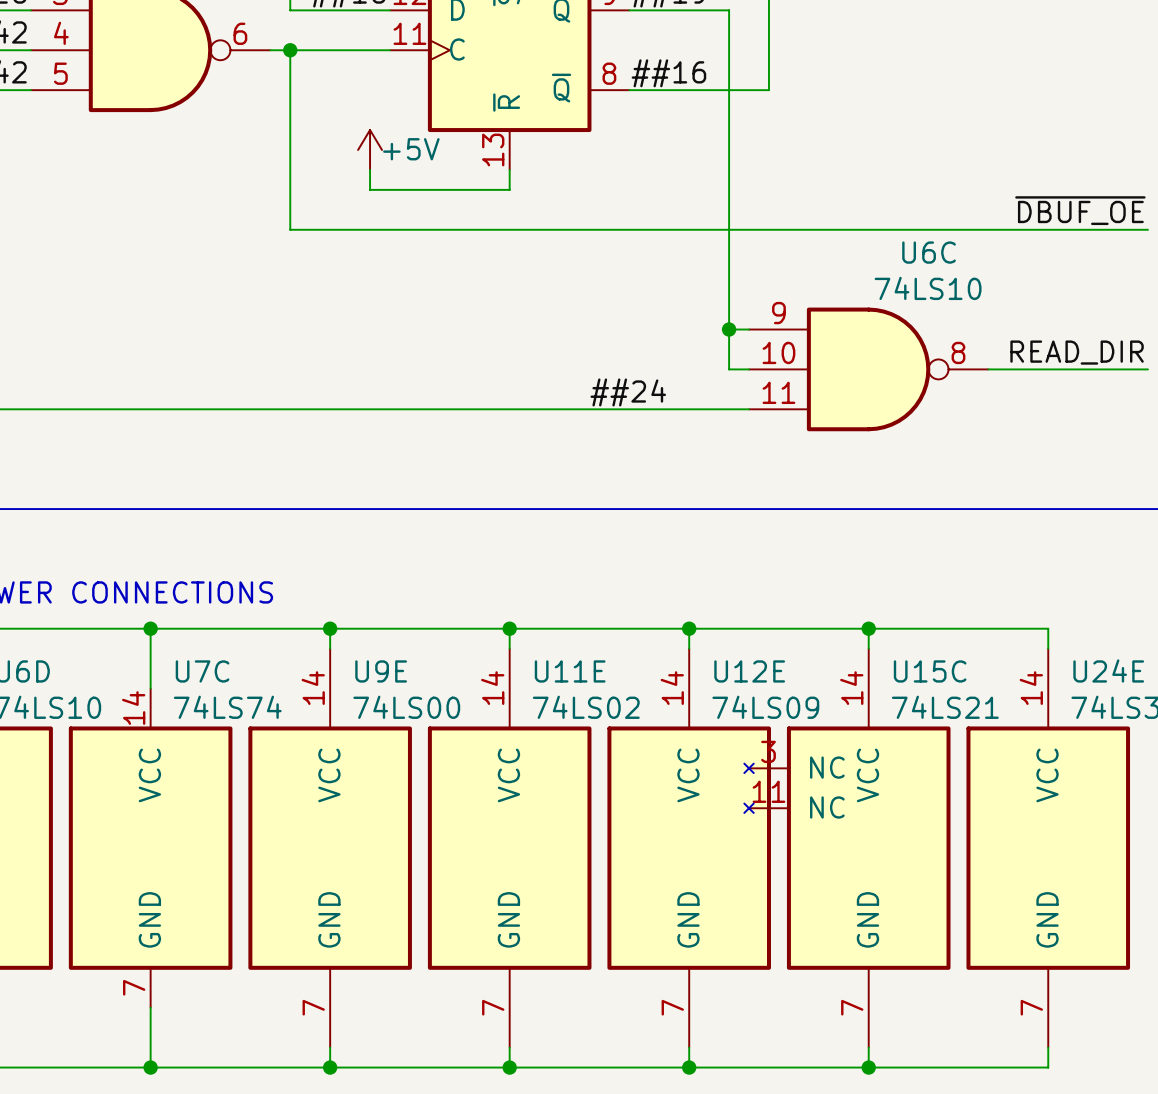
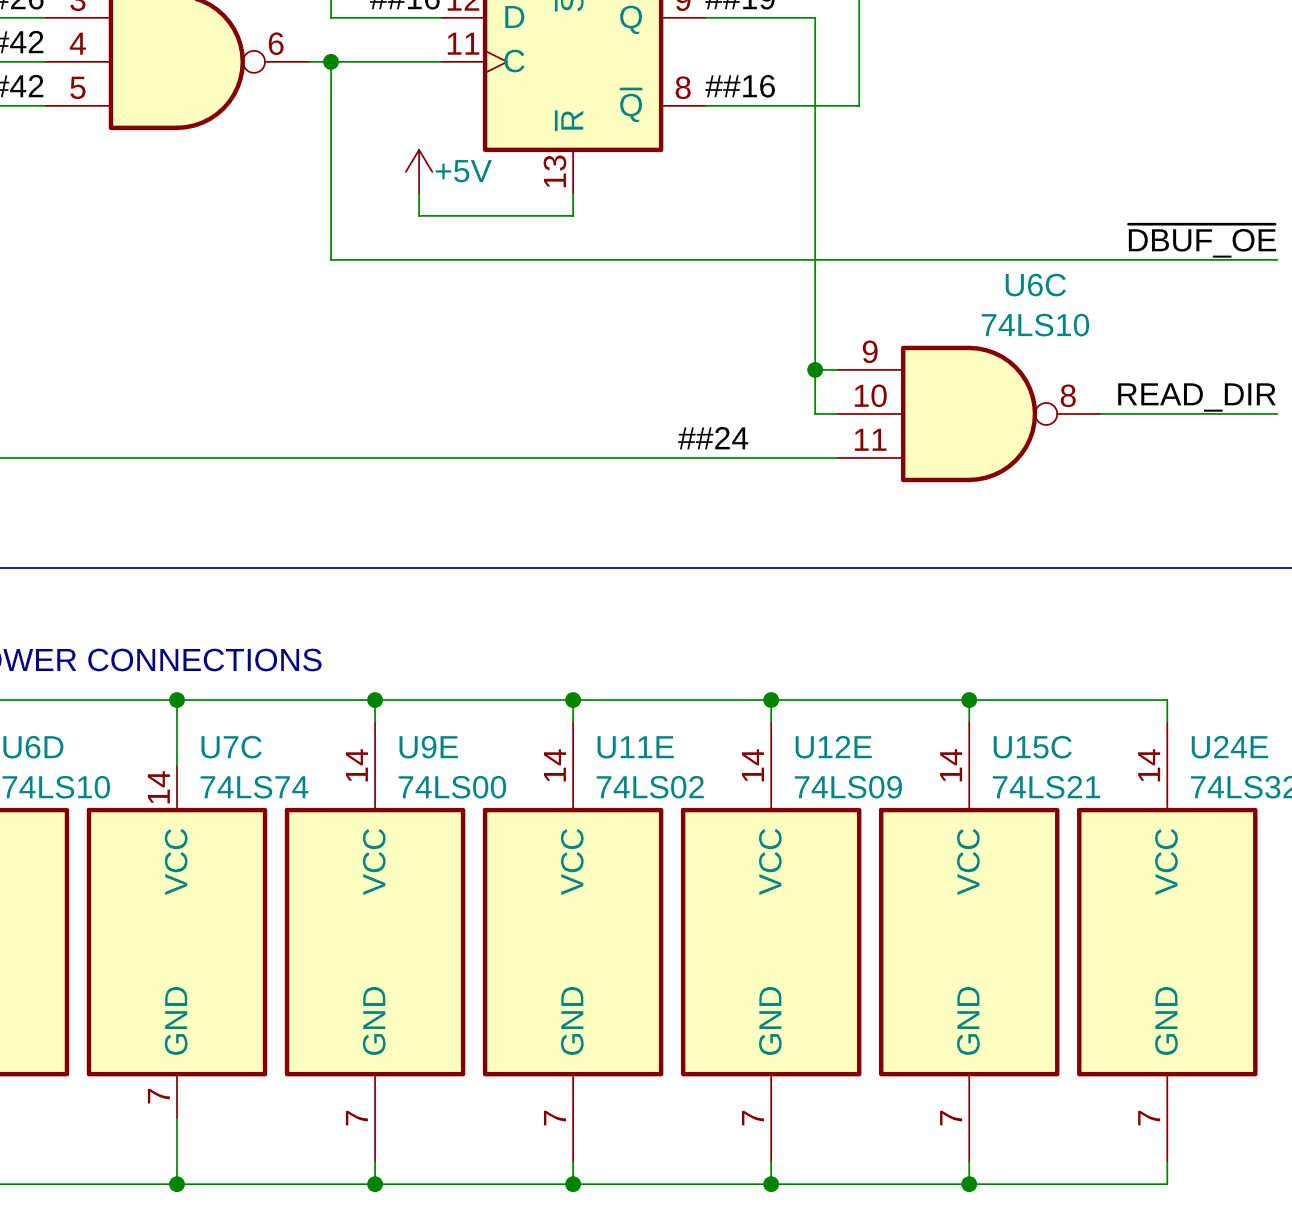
U15C symbol: [744, 648, 951, 1048] -> [879, 722, 1060, 1163]

